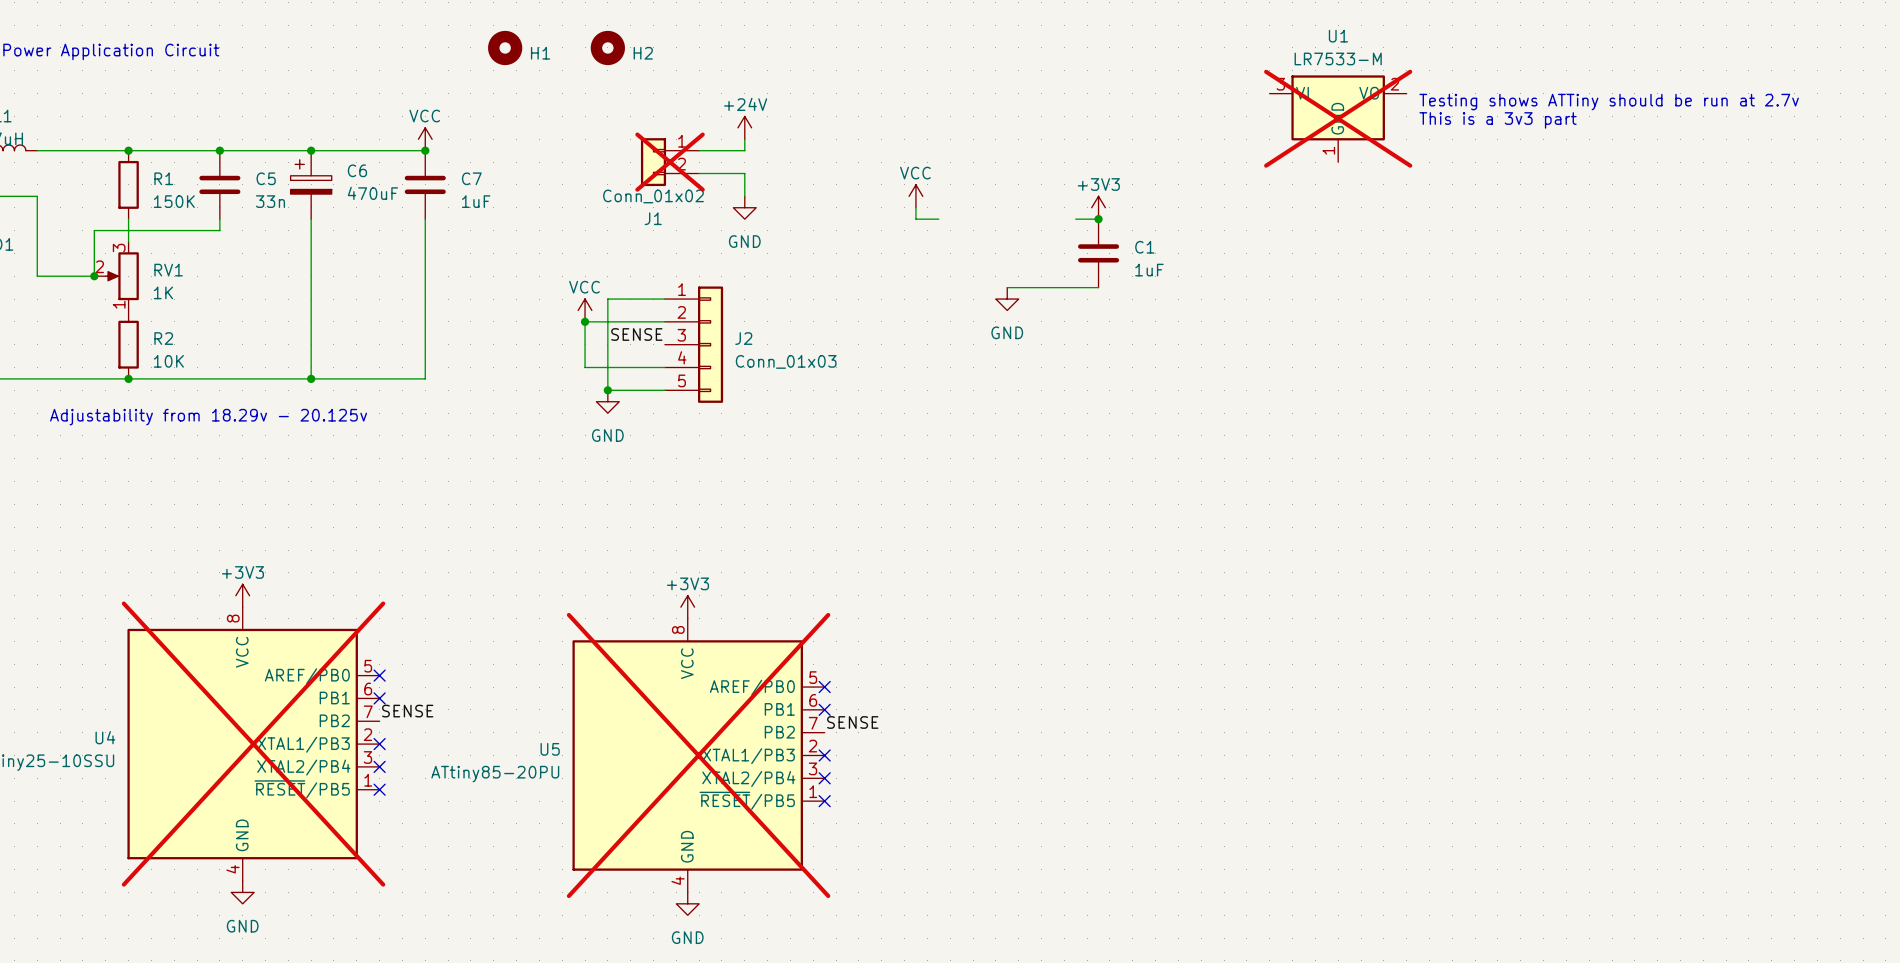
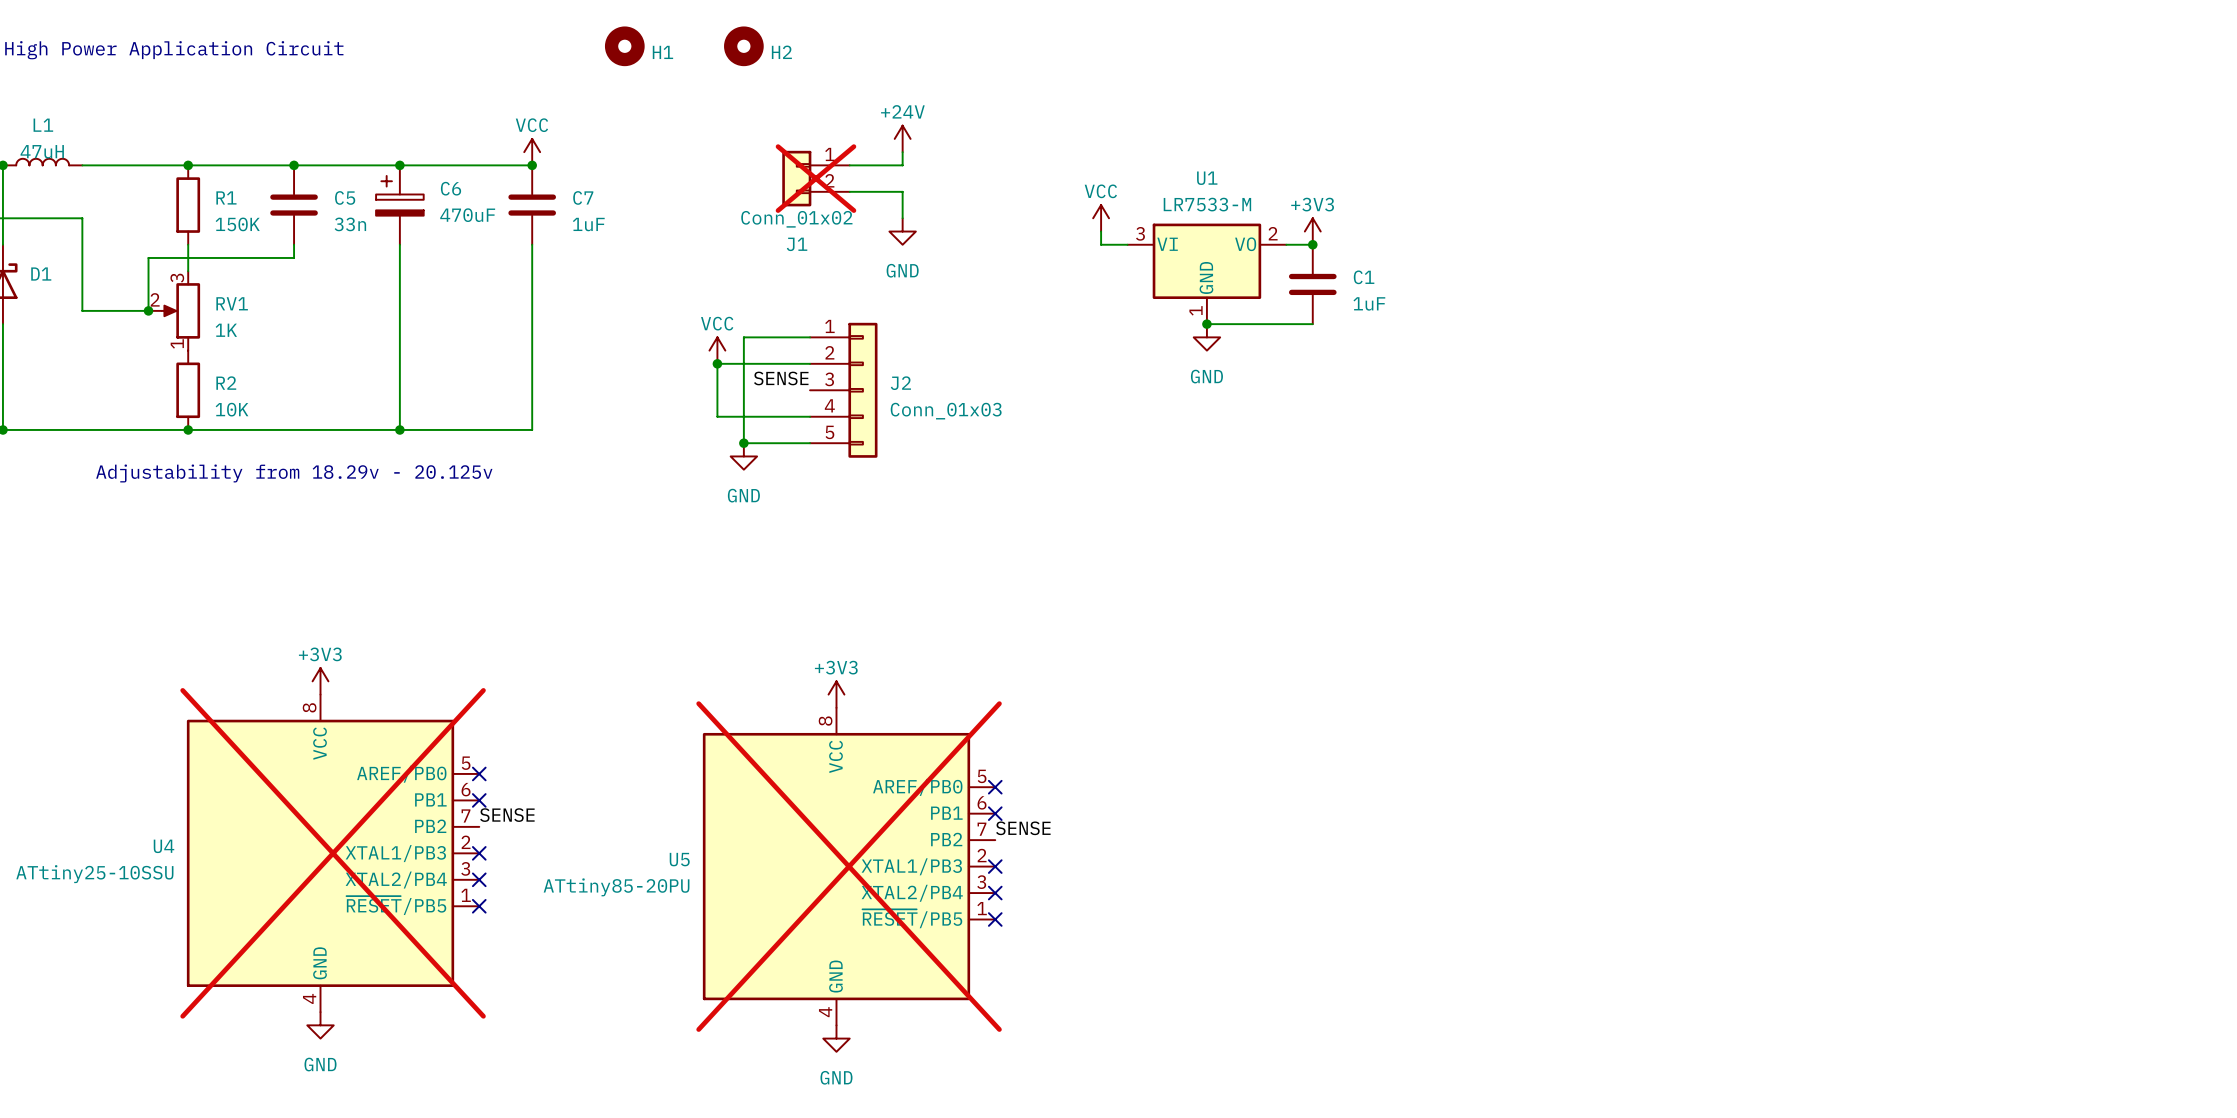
text: Testing shows ATTiny should be run at 2.7v (1609, 102) -> none
U1 position: (1338, 118) -> (1206, 273)
U1 do-not-place cross: (1338, 118) -> none
text: This is a 3v3 part (1498, 120) -> none
junction: none -> (1206, 324)

